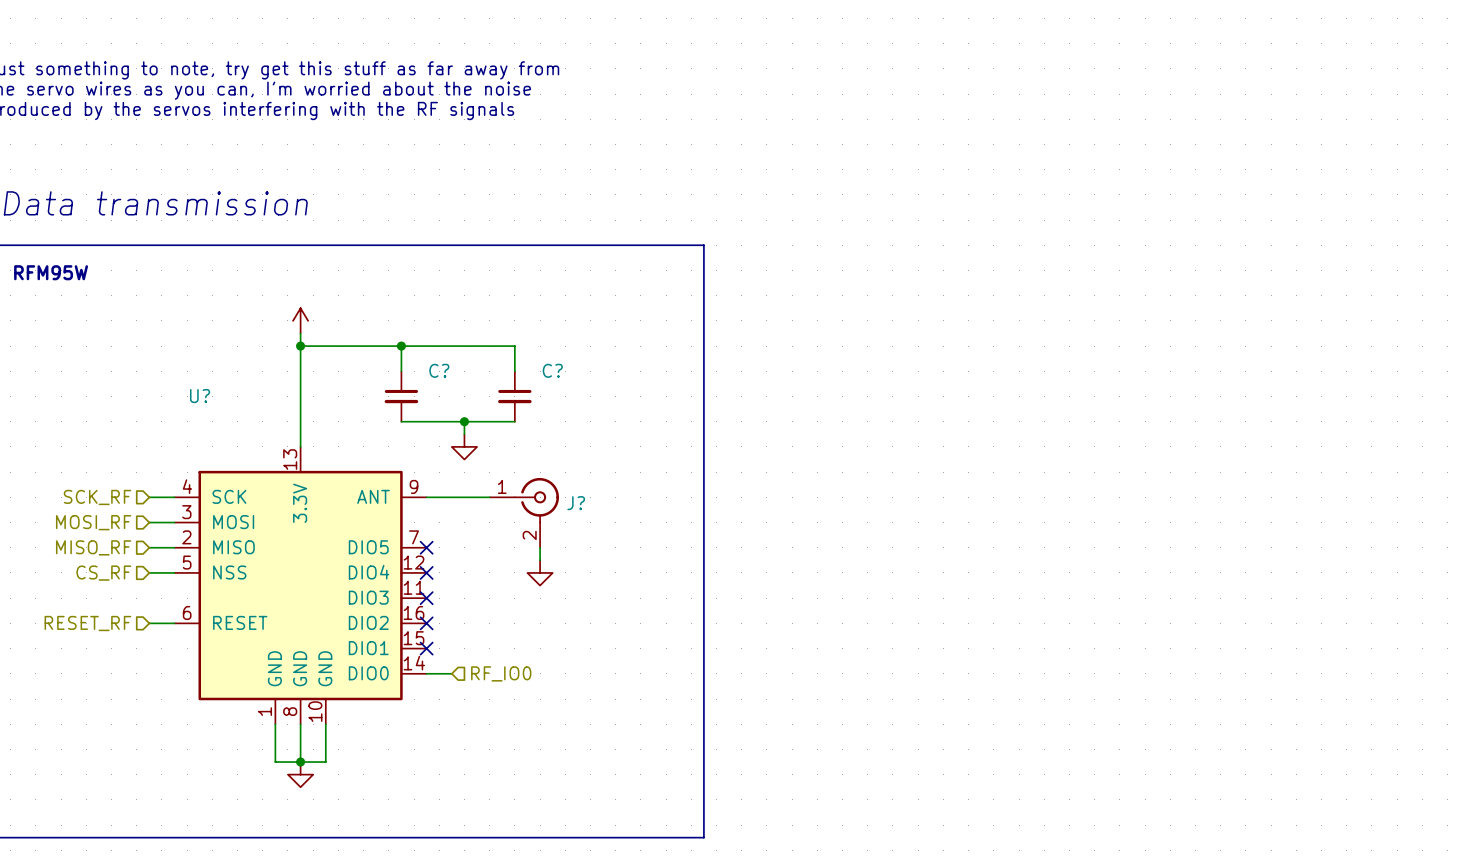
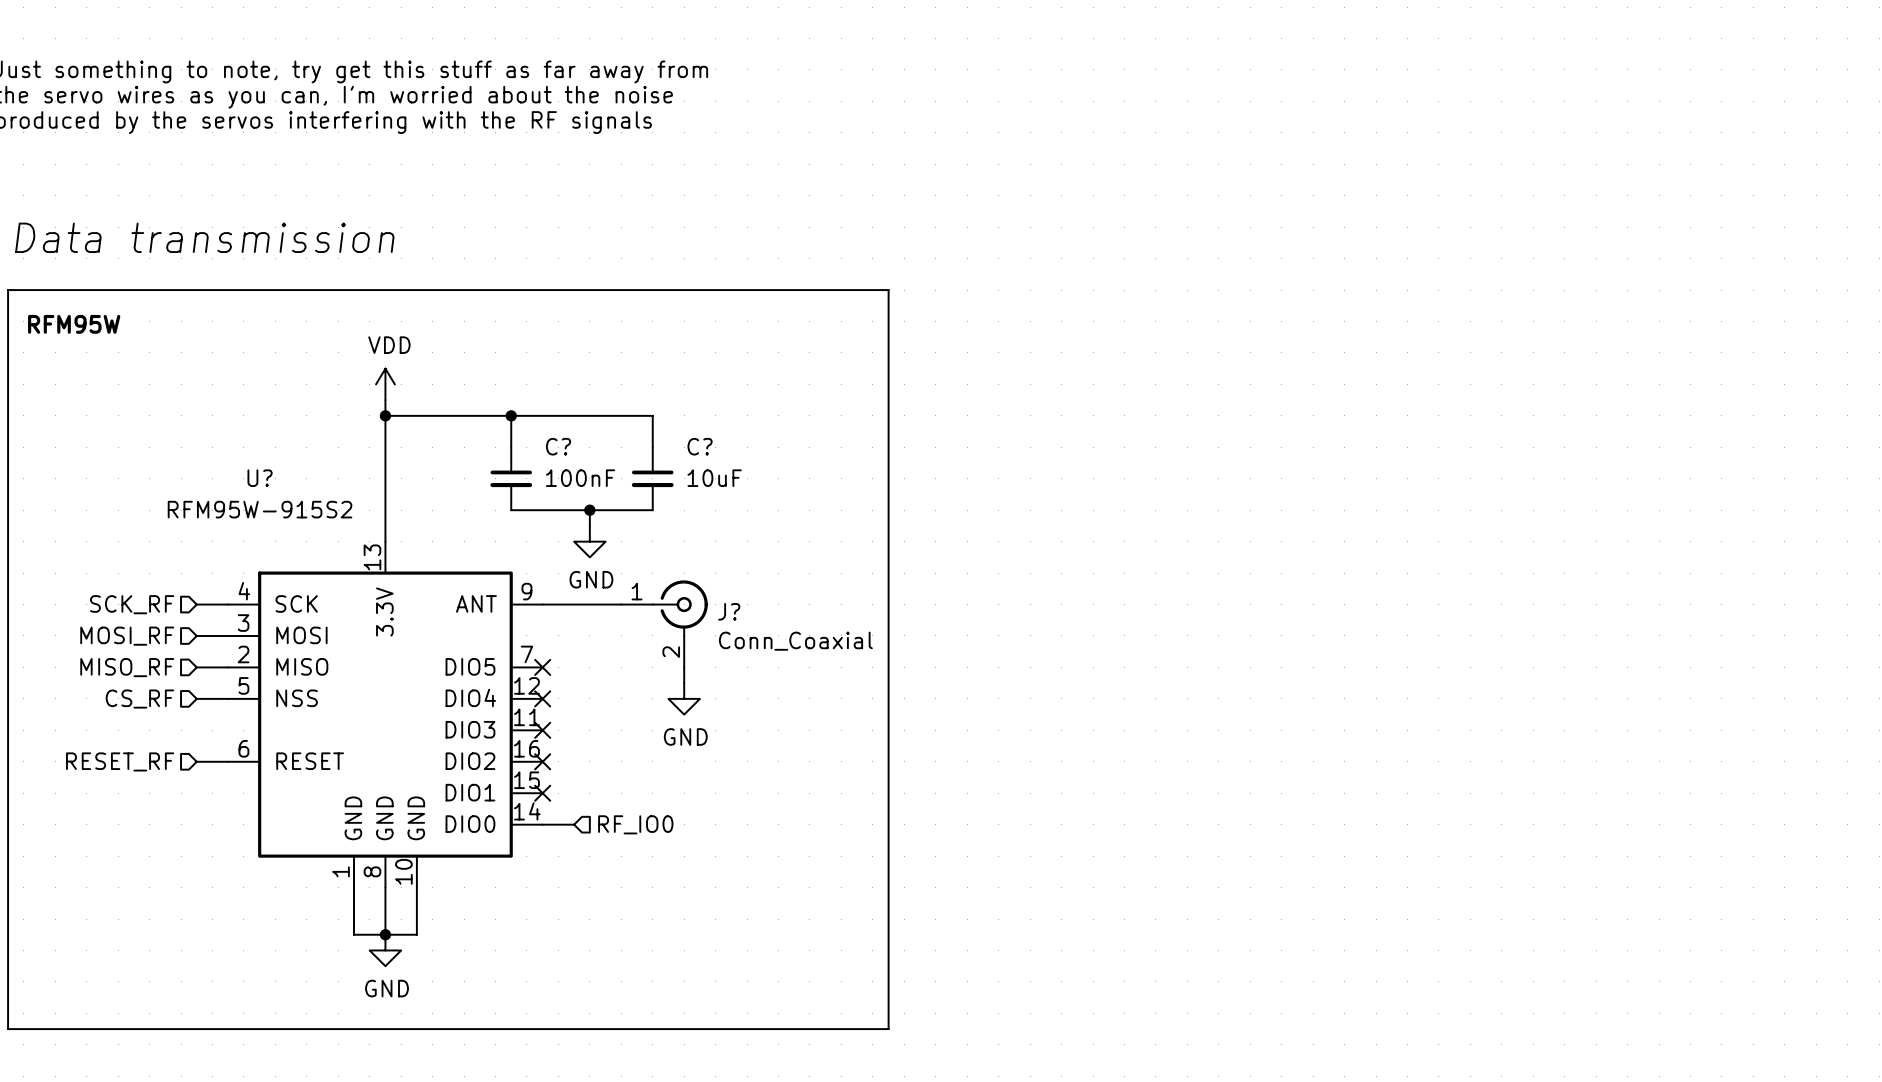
power symbol text: none -> VDD (389, 345)
C? value: none -> 100nF (580, 478)
C? value: none -> 10uF (714, 478)
U? value: none -> RFM95W-915S2 (260, 509)
power symbol text: none -> GND (591, 579)
J? value: none -> Conn_Coaxial (795, 641)
power symbol text: none -> GND (685, 736)
power symbol text: none -> GND (387, 988)

